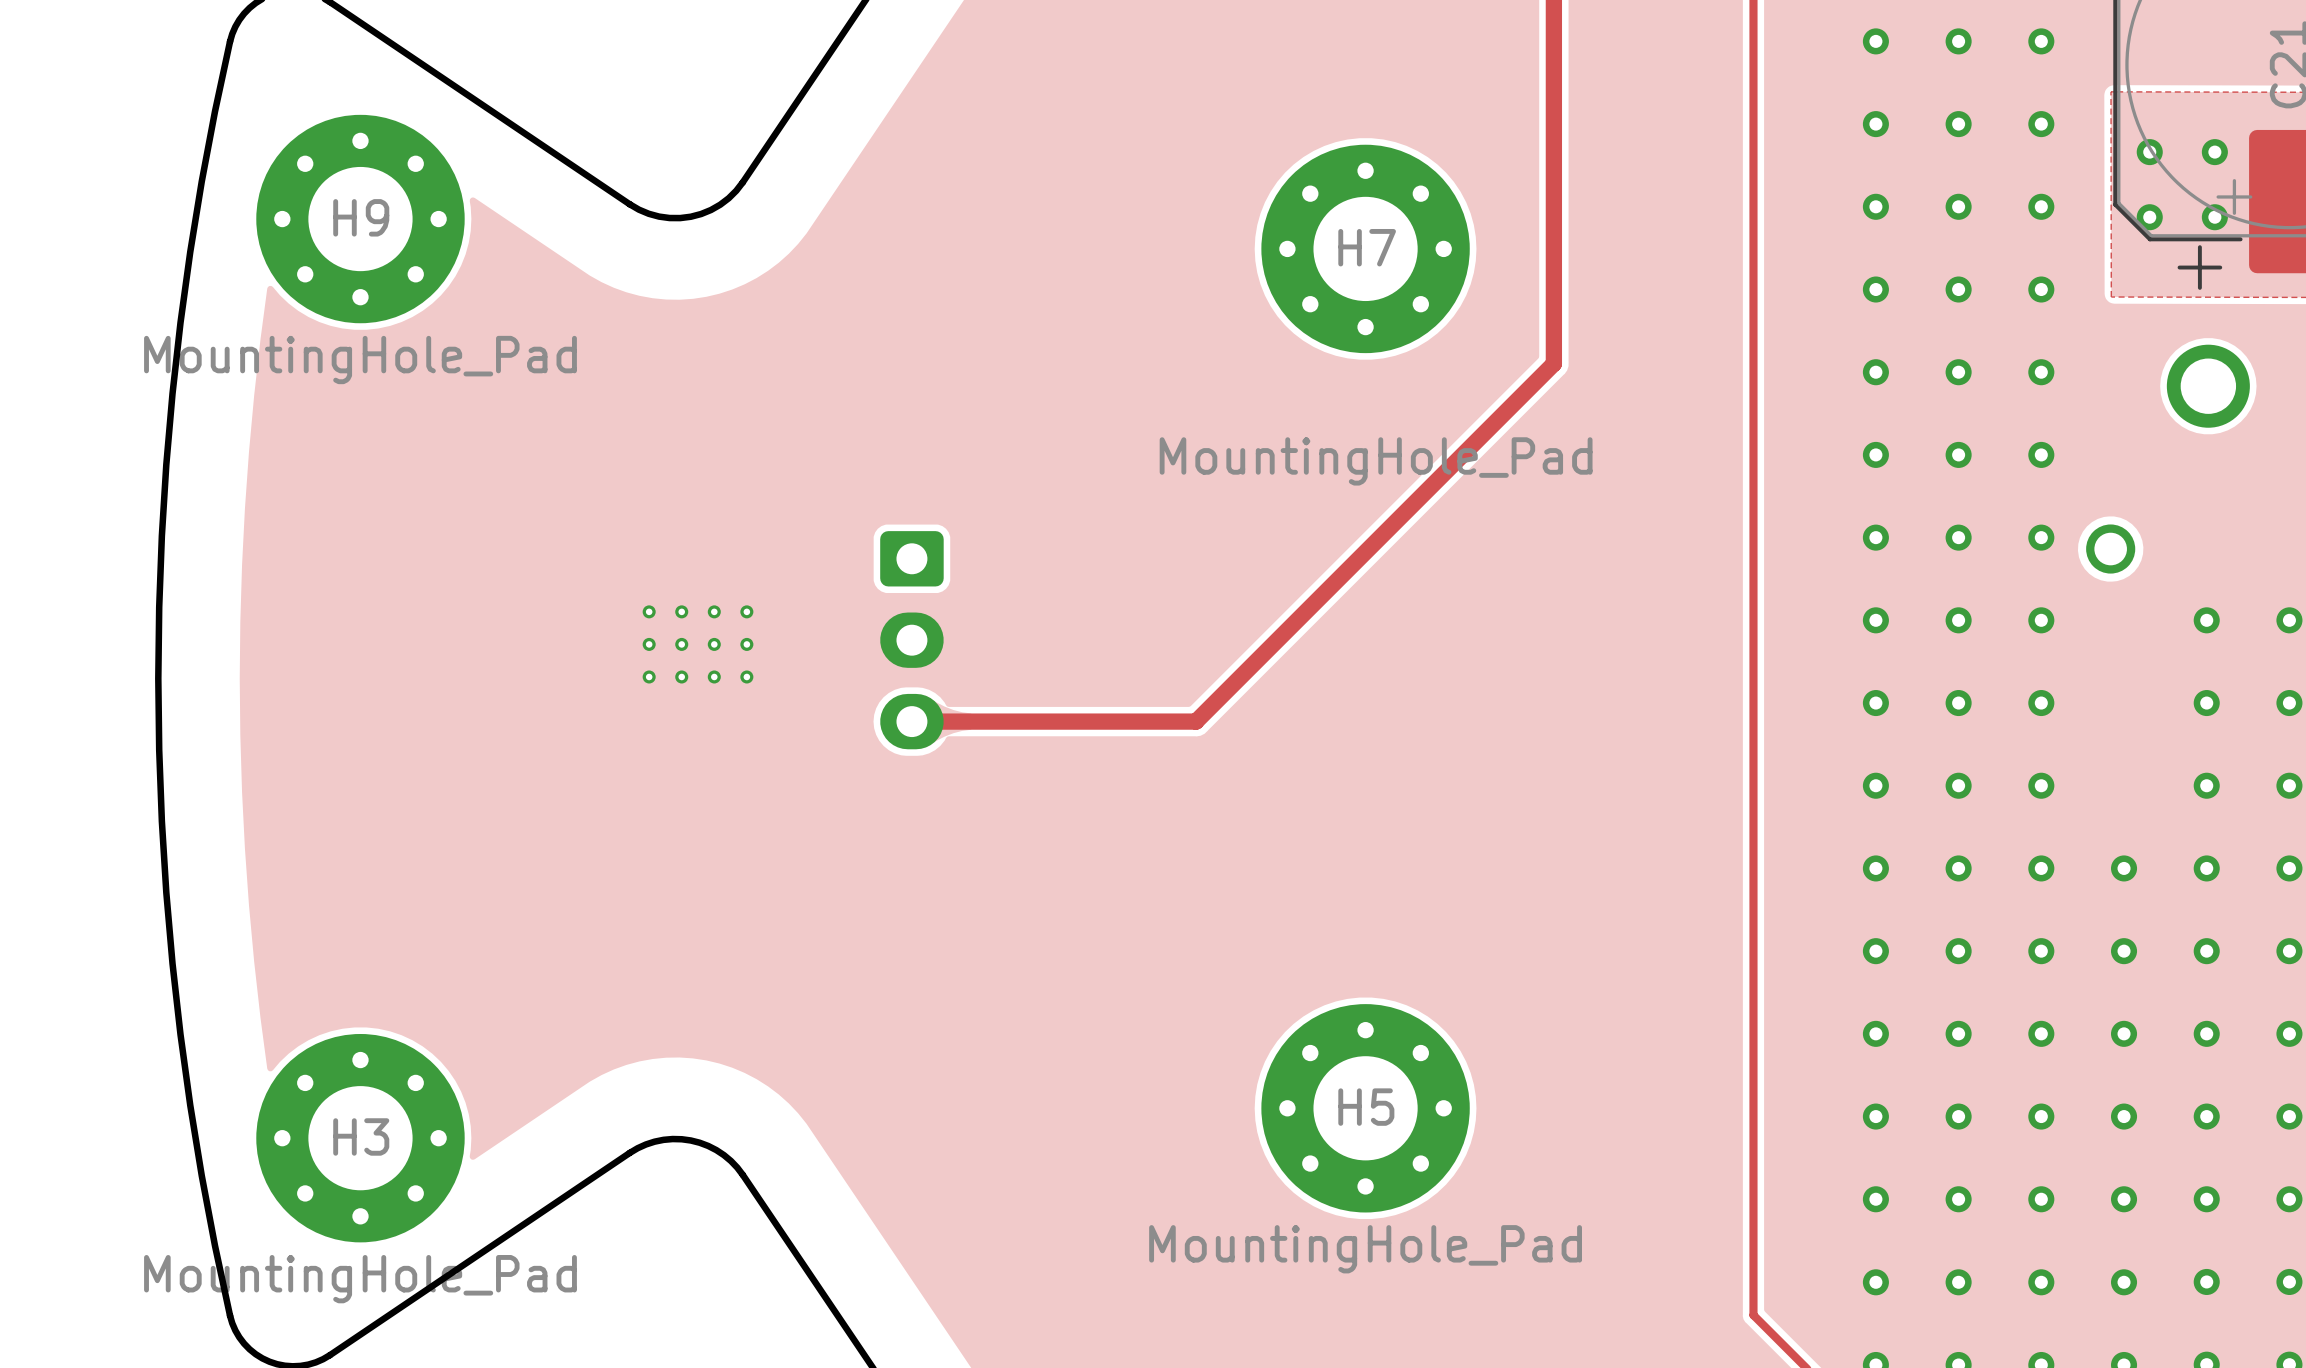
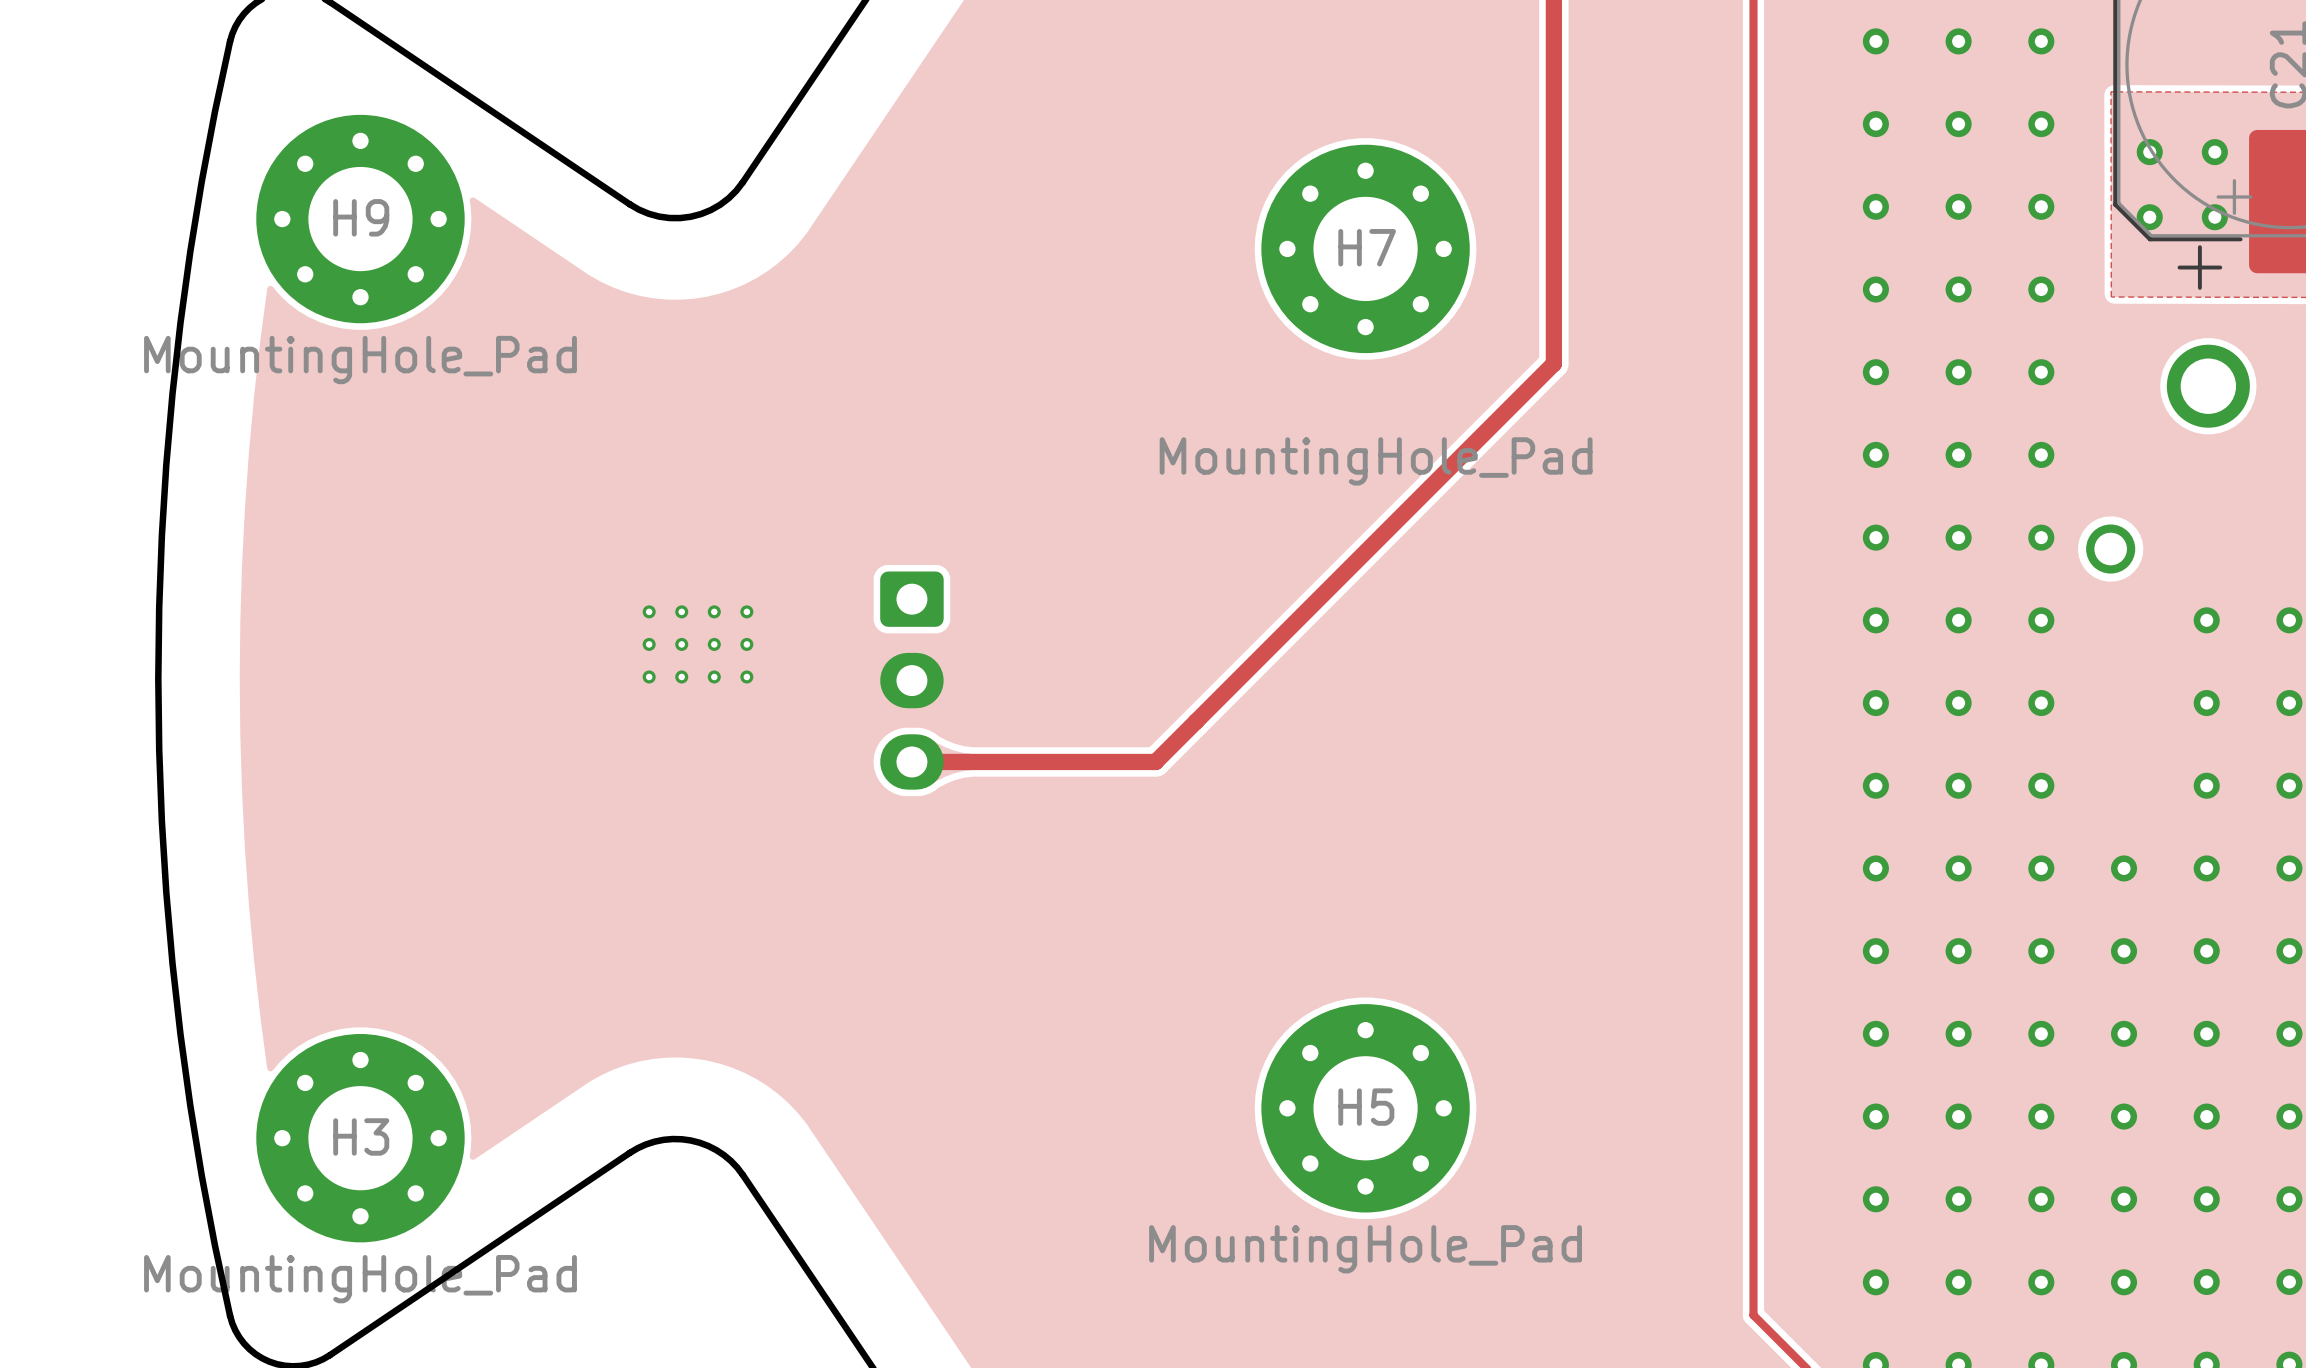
part position: (911, 640) -> (911, 680)
track: (911, 721) (1196, 721) -> (911, 761) (1155, 761) (1196, 721)

